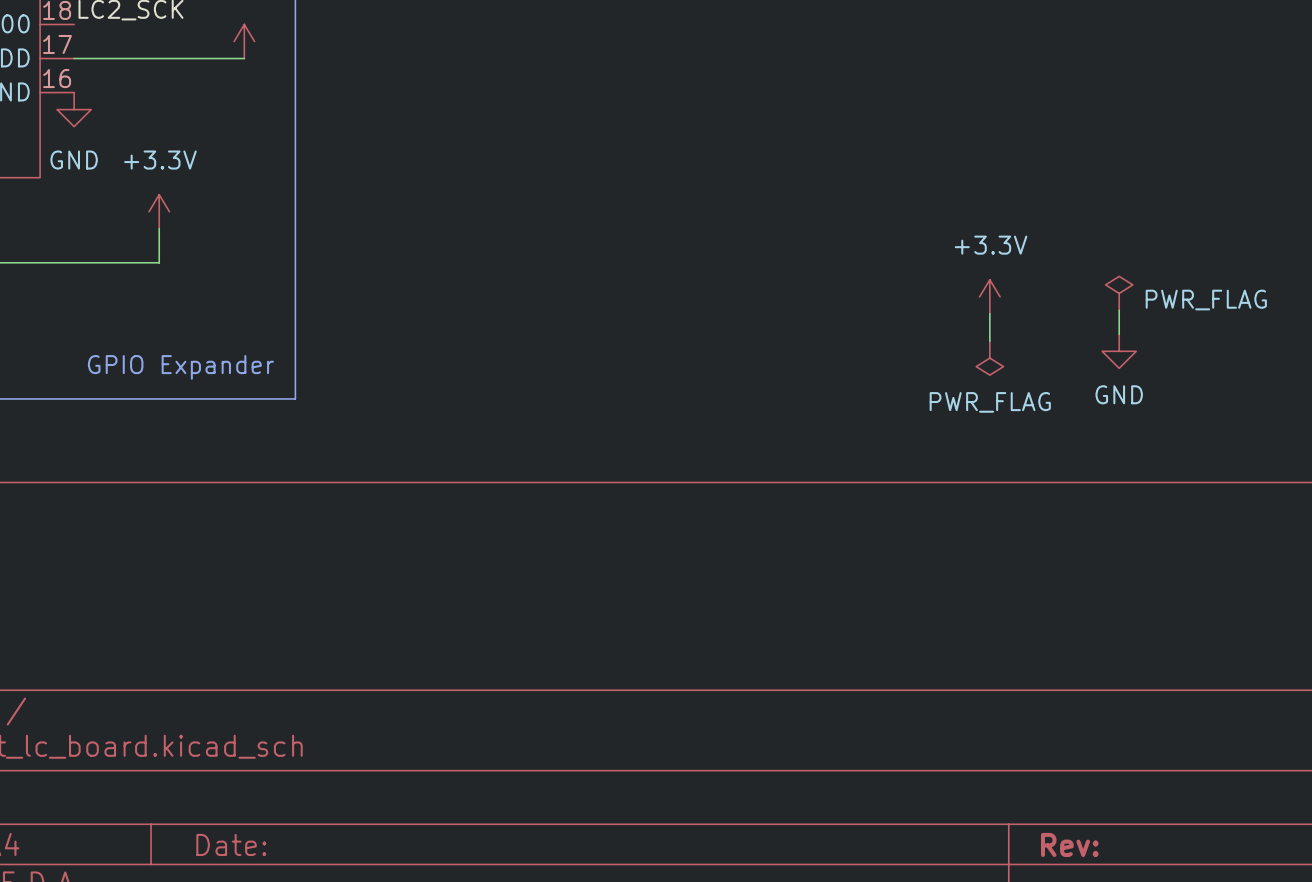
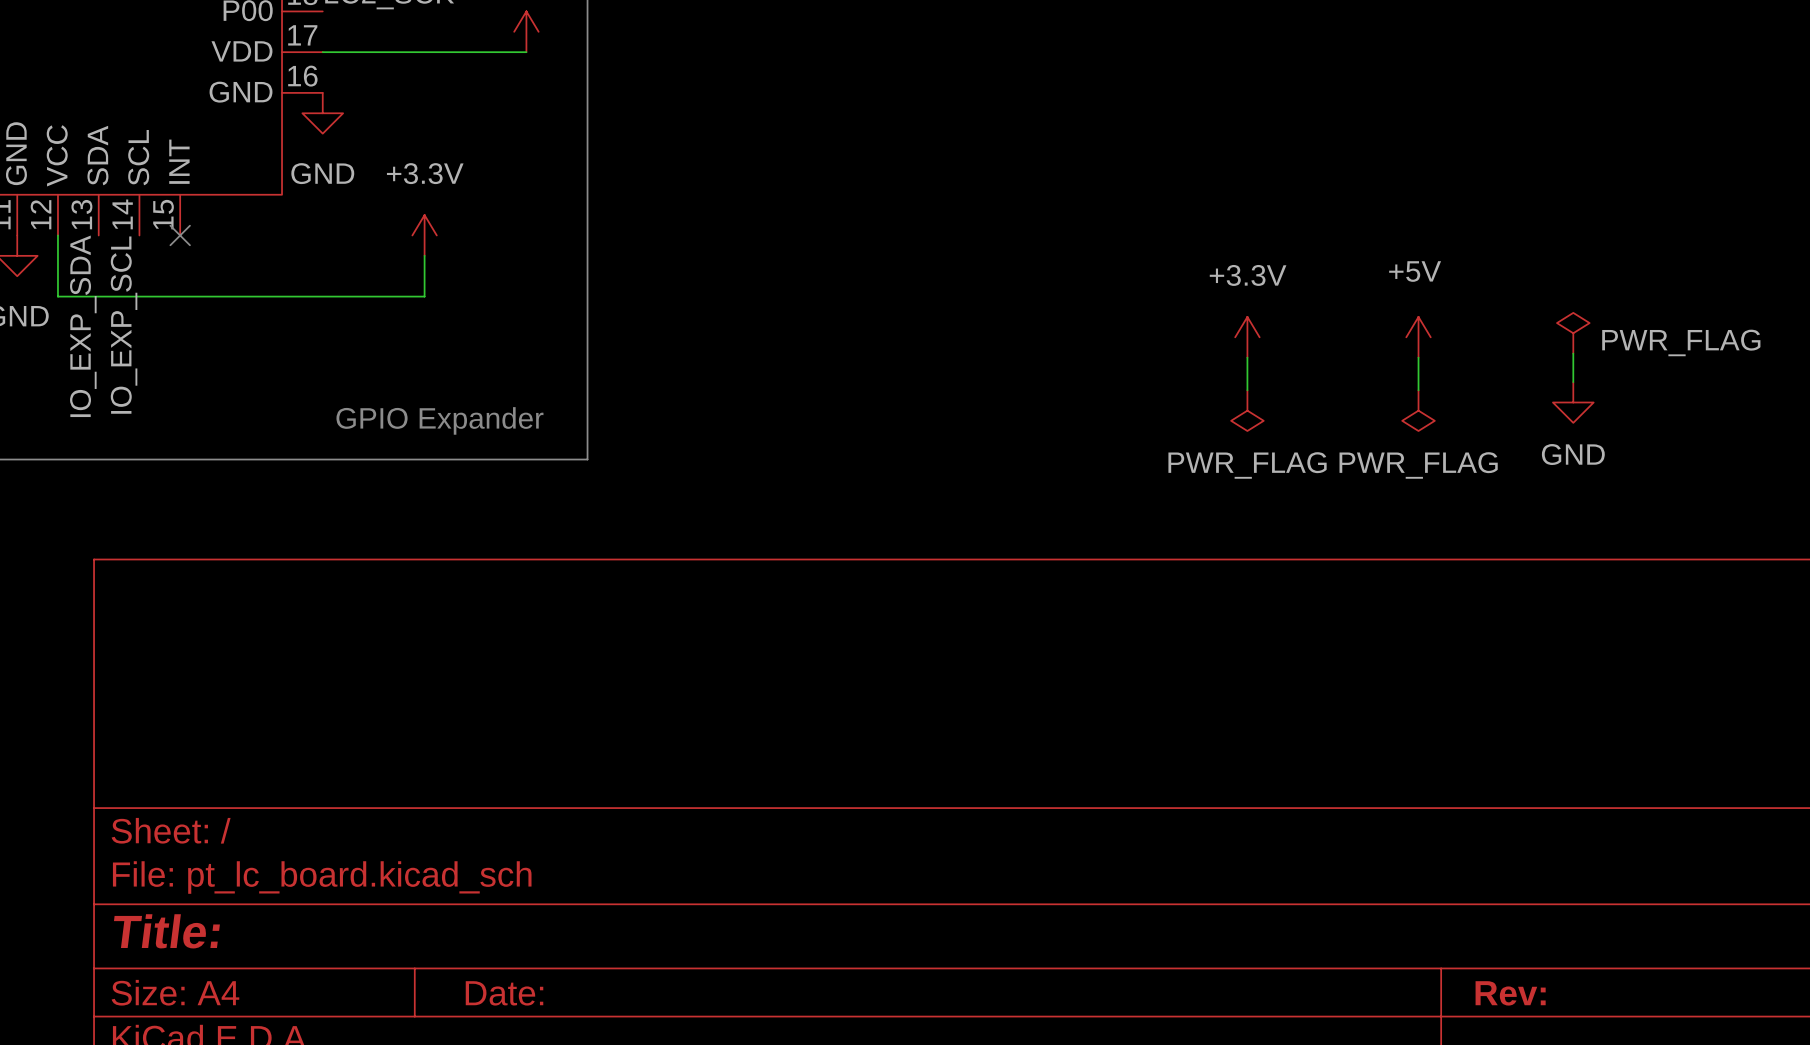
power symbol: none -> +3.3V (1247, 337)
power symbol: +3.3V (989, 296) -> +5V (1418, 337)
wire: none -> (1247, 357) (1247, 390)
power symbol: none -> PWR_FLAG (1247, 410)

